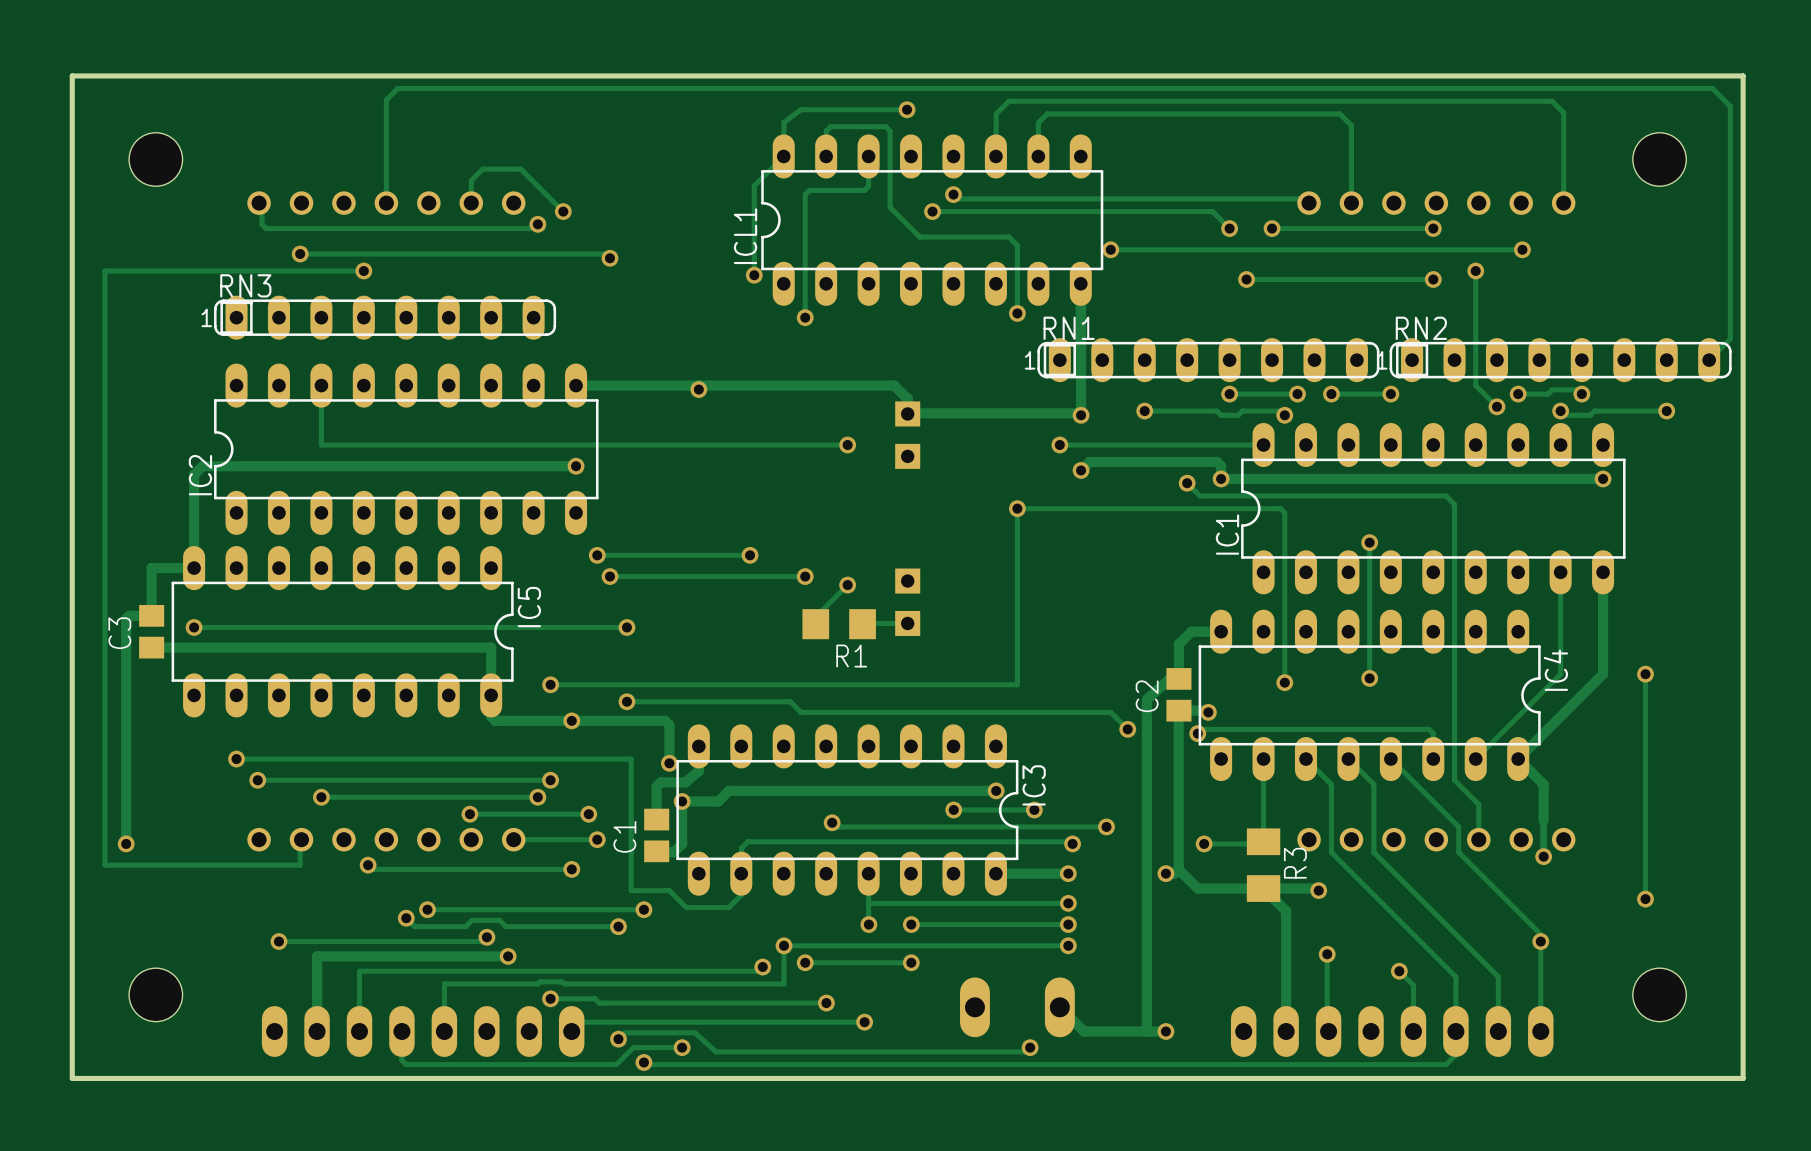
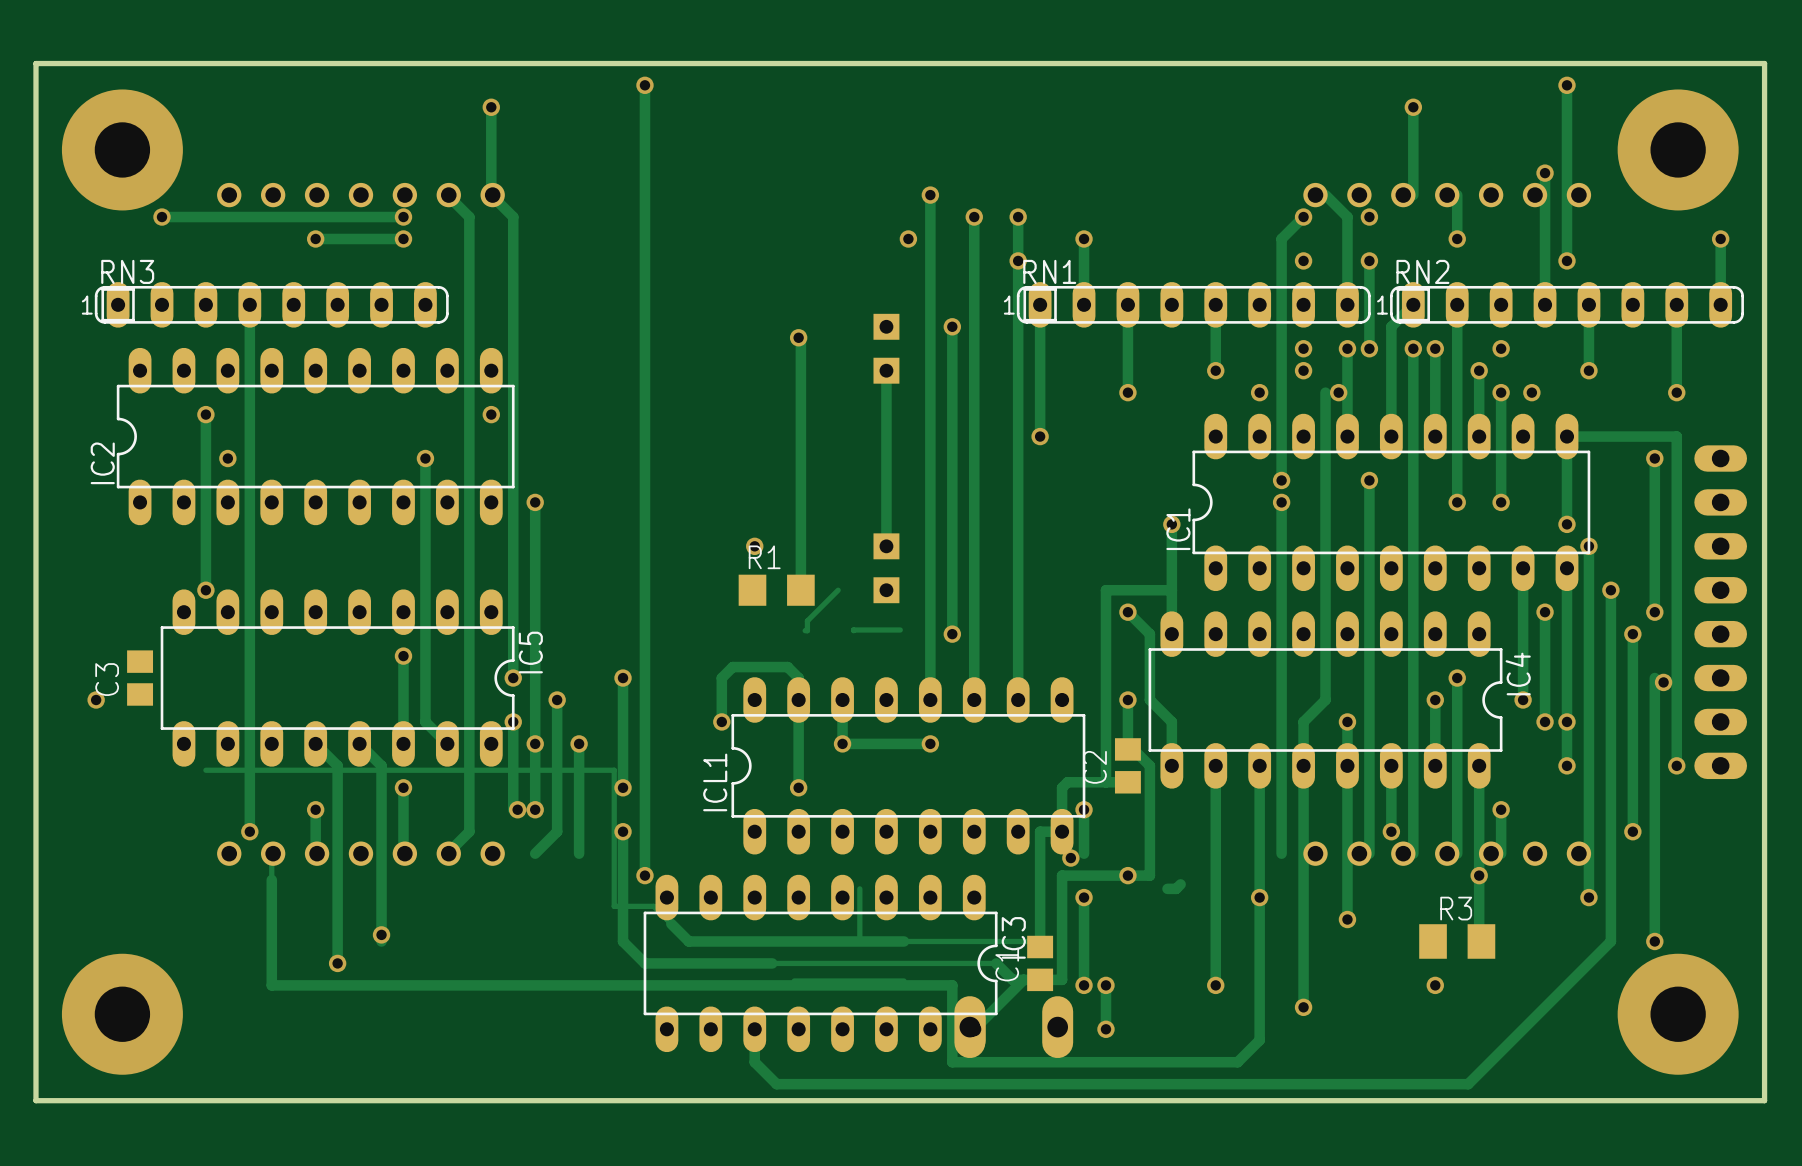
track: none -> (644, 85) (644, 875)
via: none -> (644, 85)
track: none -> (1566, 85) (1566, 260)
via: none -> (1566, 85)
track: (907, 109) (800, 109) (783, 122) (783, 156) (754, 185) (754, 275) -> none
via: (907, 109) -> none
track: none -> (491, 107) (491, 195) (513, 217) (513, 678)
via: none -> (491, 107)
track: none -> (1413, 107) (1413, 195)
via: none -> (1413, 107)
track: (826, 156) (826, 130) (830, 126) (885, 126) (890, 130) (890, 207) (919, 237) (1008, 237) (1017, 245) (1017, 313) -> none
track: (868, 156) (868, 186) (864, 190) (809, 190) (805, 194) (805, 317) -> none
track: (995, 156) (996, 113) (1008, 101) (1552, 101) (1563, 112) (1563, 203) -> none
track: (1038, 156) (1038, 122) (1047, 113) (1339, 113) (1351, 125) (1351, 203) -> none
part: (155, 159) -> none
via: none -> (122, 149)
part: (1659, 159) -> none
via: none -> (1678, 149)
track: none -> (1545, 173) (1545, 304)
via: none -> (1545, 173)
track: (953, 194) (957, 198) (1305, 198) (1309, 203) -> none
via: (953, 194) -> none
track: (259, 203) (261, 206) (261, 224) (266, 228) (529, 228) (533, 224) (537, 224) -> none
track: (386, 203) (386, 99) (397, 88) (1712, 88) (1730, 106) (1730, 338) (1709, 360) -> none
track: (471, 203) (471, 180) (482, 169) (520, 169) (563, 211) -> none
track: none -> (930, 195) (930, 700)
via: none -> (930, 195)
track: none -> (1325, 195) (1347, 217) (1347, 304)
track: none -> (1457, 195) (1457, 238)
via: (563, 211) -> none
track: (932, 211) (1212, 211) (1229, 228) -> none
via: (932, 211) -> none
ICL1 position: (932, 220) -> (908, 765)
via: none -> (162, 217)
track: none -> (403, 217) (162, 217)
via: none -> (403, 217)
via: (537, 224) -> none
track: none -> (974, 217) (974, 700)
via: none -> (974, 217)
track: none -> (1018, 217) (1018, 700)
via: none -> (1018, 217)
track: none -> (1303, 217) (1281, 238) (1281, 480)
via: none -> (1303, 217)
via: none -> (1369, 217)
via: (1229, 228) -> none
via: (1272, 228) -> none
track: (1433, 228) (1272, 228) -> none
via: (1433, 228) -> none
via: none -> (315, 238)
track: none -> (403, 238) (315, 238)
via: none -> (403, 238)
via: none -> (908, 238)
track: none -> (1084, 238) (1084, 304)
via: none -> (1457, 238)
track: none -> (1720, 238) (1720, 304)
via: none -> (1720, 238)
via position: (1110, 249) -> (1084, 238)
track: (1522, 249) (1110, 249) -> none
via: (1522, 249) -> none
track: (300, 254) (605, 254) (609, 258) -> none
via: (300, 254) -> none
via: (609, 258) -> none
via: none -> (1018, 260)
via: none -> (1303, 260)
track: none -> (1369, 260) (1369, 348)
via: none -> (1369, 260)
via: none -> (1566, 260)
track: (363, 271) (104, 271) (104, 865) (300, 865) -> (1259, 765) (1259, 1040) (1237, 1062) (952, 1062) (952, 985) (271, 985) (271, 880)
via: (363, 271) -> none
track: (1475, 271) (1475, 385) (1496, 406) -> none
via: (1475, 271) -> none
via: (754, 275) -> none
via: (1246, 279) -> none
track: (1433, 279) (1246, 279) -> none
via: (1433, 279) -> none
track: none -> (249, 304) (249, 831)
track: none -> (1040, 304) (1040, 436)
track: none -> (1127, 304) (1127, 392)
track: none -> (1215, 304) (1215, 370)
track: none -> (1413, 304) (1391, 326) (1391, 436)
track: none -> (1457, 304) (1457, 502)
track: none -> (1588, 304) (1588, 370)
track: none -> (1676, 304) (1676, 392)
via: (1017, 313) -> none
RN3 position: (385, 317) -> (271, 304)
via position: (805, 317) -> (798, 337)
track: (1080, 317) (1080, 283) (1081, 415) (1079, 413) (907, 413) -> none
track: none -> (952, 326) (952, 634)
via: none -> (952, 326)
track: none -> (798, 337) (800, 340) (800, 590)
part: none -> (886, 348)
via: none -> (1303, 348)
track: none -> (1347, 348) (1347, 436)
via: none -> (1347, 348)
via: none -> (1369, 348)
track: none -> (1413, 348) (1413, 853)
via: none -> (1413, 348)
track: none -> (1435, 348) (1435, 436)
via: none -> (1435, 348)
via: none -> (1501, 348)
RN1 position: (1208, 360) -> (1193, 304)
RN2 position: (1560, 360) -> (1566, 304)
track: none -> (886, 370) (886, 546)
via: none -> (1215, 370)
via: none -> (1303, 370)
track: none -> (1479, 370) (1479, 436)
via: none -> (1479, 370)
via: none -> (1588, 370)
track: (321, 385) (321, 445) (847, 445) -> none
track: (576, 385) (894, 385) (907, 398) (907, 413) -> none
via: (698, 389) -> none
via: (1229, 394) -> none
via: none -> (1259, 392)
track: (1297, 394) (1229, 394) -> none
via: (1297, 394) -> none
track: none -> (1325, 392) (1325, 700) (1303, 721) (1303, 1007)
track: (1390, 394) (1331, 394) -> none
via: (1390, 394) -> none
track: none -> (1501, 392) (1501, 502)
track: (1581, 394) (1577, 389) (1552, 389) (1547, 394) (1518, 394) -> none
via: (1581, 394) -> none
via position: (1496, 406) -> (1501, 392)
track: (1144, 411) (1216, 411) (1221, 415) (1238, 415) (1242, 411) (1280, 411) (1284, 415) -> none
via position: (1144, 411) -> (1127, 392)
via: (1560, 411) -> none
track: (1666, 411) (1594, 411) (1590, 415) (1564, 415) (1560, 411) -> none
via position: (1666, 411) -> (1676, 392)
track: none -> (205, 414) (205, 590)
via: none -> (205, 414)
via: none -> (491, 414)
via: (1081, 415) -> none
via: (1284, 415) -> none
part: (907, 435) -> none
via: (847, 445) -> none
via position: (1059, 445) -> (1040, 436)
track: (1263, 445) (1059, 445) -> none
IC2 position: (406, 449) -> (315, 436)
via: none -> (227, 458)
track: none -> (425, 458) (425, 721) (447, 743)
via: none -> (425, 458)
track: none -> (1654, 458) (1654, 612)
via: none -> (1654, 458)
track: (576, 466) (202, 466) (194, 474) (194, 568) (151, 568) (151, 615) (129, 615) (126, 619) (126, 843) -> none
via: (576, 466) -> none
track: (1081, 470) (1089, 461) (1216, 461) (1221, 466) (1221, 478) (1603, 478) -> none
via: (1081, 470) -> none
via: (1221, 478) -> none
via: none -> (1281, 480)
track: none -> (1369, 480) (1369, 853)
via: none -> (1369, 480)
via: (1603, 478) -> none
track: (1187, 483) (1199, 495) (1446, 495) (1454, 504) (1454, 780) (1478, 804) (1478, 839) -> none
via: (1187, 483) -> none
track: none -> (535, 502) (535, 809)
via: none -> (535, 502)
track: none -> (1281, 502) (1281, 853)
via: none -> (1281, 502)
via: none -> (1457, 502)
via: none -> (1501, 502)
via: (1017, 508) -> none
IC1 position: (1433, 508) -> (1391, 502)
track: none -> (1171, 524) (1171, 634)
via: none -> (1171, 524)
track: none -> (1566, 524) (1566, 436) (1676, 436) (1676, 765)
via: none -> (1566, 524)
track: (1369, 542) (1369, 678) -> none
via: (1369, 542) -> none
track: none -> (1588, 546) (1588, 897)
via: none -> (1588, 546)
via: (597, 555) -> none
track: (750, 555) (597, 555) -> none
via position: (750, 555) -> (754, 546)
track: none -> (1523, 568) (1523, 700)
track: none -> (1566, 568) (1566, 765)
track: (1560, 572) (1560, 674) (1475, 759) -> none
track: (1603, 572) (1603, 674) (1518, 759) (1543, 784) (1543, 856) -> none
via: (609, 576) -> none
track: (805, 576) (609, 576) -> none
via: (805, 576) -> none
via: none -> (205, 590)
via: (847, 585) -> none
track: none -> (1171, 590) (1105, 590) (1105, 782)
track: none -> (1610, 590) (1610, 941) (1468, 1084) (776, 1084) (754, 1062) (754, 1029)
via: none -> (1610, 590)
part position: (907, 602) -> (886, 568)
track: none -> (1127, 612) (1149, 634) (1149, 700) (1171, 721) (1171, 765)
via: none -> (1127, 612)
track: none -> (1545, 612) (1545, 721)
via: none -> (1545, 612)
via: none -> (1654, 612)
part: none -> (1720, 612)
R1 position: (839, 624) -> (776, 590)
via: (194, 627) -> none
track: (626, 627) (194, 627) -> none
via: (626, 627) -> none
via: none -> (952, 634)
track: none -> (1632, 634) (1632, 831)
via: none -> (1632, 634)
C3 position: (151, 631) -> (140, 678)
IC5 position: (342, 631) -> (337, 678)
track: (1221, 631) (1191, 631) (1178, 644) (1178, 678) (1169, 678) (1146, 699) (1146, 1031) -> none
track: (491, 647) (151, 647) -> (469, 654) (469, 217) (447, 195)
track: none -> (403, 656) (403, 743)
via: none -> (403, 656)
R1 name position: R1 (851, 656) -> R1 (764, 557)
via: none -> (513, 678)
track: none -> (623, 678) (623, 787)
via: none -> (623, 678)
track: none -> (1457, 678) (1457, 853)
via: none -> (1457, 678)
track: none -> (1654, 678) (1654, 941)
track: (1645, 674) (1645, 899) -> none
via: (1369, 678) -> none
track: (1284, 682) (1284, 512) (1280, 508) (1017, 508) (1017, 684) (550, 684) -> none
via: (1284, 682) -> none
via: (550, 684) -> none
via: none -> (96, 700)
track: none -> (557, 700) (557, 831) (535, 853)
via: none -> (557, 700)
track: none -> (842, 700) (842, 743) (930, 743)
track: none -> (1435, 700) (1435, 765)
via: none -> (1435, 700)
via: none -> (1523, 700)
C2 position: (1178, 694) -> (1127, 765)
IC4 position: (1369, 695) -> (1325, 700)
track: (626, 701) (790, 701) (800, 712) (1110, 712) (1127, 729) -> none
via: (626, 701) -> none
track: none -> (513, 721) (513, 809)
via: none -> (513, 721)
track: none -> (721, 721) (721, 678) (732, 667) (787, 667) (798, 678) (798, 787)
via: none -> (721, 721)
track: (1208, 712) (1178, 710) (1178, 869) (1197, 888) (1316, 888) (1318, 890) -> none
via: (1208, 712) -> none
track: none -> (1347, 721) (1347, 919)
via: none -> (1347, 721)
via: none -> (1545, 721)
via: none -> (1566, 721)
track: (491, 716) (495, 720) (665, 720) (669, 725) (669, 763) -> (469, 726) (469, 831) (447, 853)
via: (571, 720) -> none
via position: (1127, 729) -> (1127, 700)
track: none -> (315, 743) (337, 765) (337, 963)
track: none -> (359, 743) (381, 765) (381, 941)
via: none -> (535, 743)
via: none -> (579, 743)
via: none -> (842, 743)
via: none -> (930, 743)
track: (1197, 733) (1202, 729) (1429, 729) (1433, 733) (1433, 759) -> none
via: (1197, 733) -> none
track: (698, 746) (698, 771) (685, 782) (660, 782) (656, 786) (656, 819) -> none
track: none -> (1215, 765) (1215, 985)
track: none -> (1391, 765) (1391, 831)
via: none -> (1566, 765)
via: none -> (1676, 765)
via: (236, 759) -> none
track: (1263, 759) (1263, 841) (1261, 843) (1204, 843) -> none
track: (1305, 759) (1331, 784) (1331, 852) (1455, 976) (1455, 1031) -> none
track: (1348, 759) (1373, 784) (1373, 852) (1498, 976) (1498, 1031) -> none
track: (1390, 759) (1458, 826) (1458, 852) (1540, 934) (1540, 1031) -> none
via: (669, 763) -> none
track: none -> (1481, 779) (1479, 765) (1479, 930) (1481, 932) (1481, 941)
track: none -> (1127, 782) (1067, 782) (1062, 787) (1062, 831) (1040, 831) (1040, 947)
track: none -> (403, 787) (403, 853)
via: none -> (403, 787)
via: none -> (623, 787)
via: none -> (798, 787)
via: (257, 780) -> none
track: (550, 780) (257, 780) -> none
via position: (550, 780) -> (535, 809)
track: (996, 790) (728, 790) (718, 801) (682, 801) (682, 843) (673, 852) (656, 851) -> none
via: (996, 790) -> none
via position: (321, 797) -> (315, 809)
track: none -> (315, 809) (315, 853)
track: (537, 797) (321, 797) -> none
track: none -> (1084, 809) (1084, 853)
via: none -> (1084, 809)
track: none -> (1501, 809) (1501, 853)
via: none -> (1501, 809)
via: (682, 801) -> none
via: (953, 809) -> none
track: (1034, 809) (953, 809) -> none
via: (1034, 809) -> none
IC3 position: (847, 810) -> (820, 963)
via: (469, 814) -> none
track: (588, 814) (469, 814) -> none
via: (588, 814) -> none
via: none -> (249, 831)
via: none -> (623, 831)
via: none -> (1391, 831)
via: none -> (1632, 831)
track: (832, 822) (834, 826) (1017, 827) -> none
via: (832, 822) -> none
track: (1106, 826) (1017, 826) -> none
via: (1106, 826) -> none
C1 position: (656, 835) -> (1040, 963)
track: (597, 839) (513, 839) -> (579, 853) (579, 743)
via: (597, 839) -> none
via: (126, 843) -> none
track: (1072, 843) (1070, 841) (747, 841) (741, 848) (741, 894) (728, 907) (686, 907) -> (904, 941) (688, 941) (671, 923)
via: (1204, 843) -> none
via: (1543, 856) -> none
via: none -> (644, 875)
via: none -> (1127, 875)
via: none -> (1479, 875)
R3 name position: R3 (1295, 863) -> R3 (1456, 908)
track: (368, 865) (368, 869) (571, 869) -> none
via: (368, 865) -> none
R3 rotation: 0° (1263, 865) -> 90° clockwise (1457, 941)
R3 position: (1263, 865) -> (1457, 941)
via: (571, 869) -> none
track: (1068, 873) (995, 873) -> none
via: (1068, 873) -> none
via: (1165, 873) -> none
track: none -> (1084, 897) (1084, 985)
via: none -> (1084, 897)
via: none -> (1259, 897)
via: none -> (1588, 897)
track: (1263, 888) (1286, 911) (1286, 1031) -> none
via position: (1318, 890) -> (1347, 919)
via position: (1645, 899) -> (1654, 941)
track: (1068, 903) (868, 903) -> none
via: (1068, 903) -> none
via: (427, 909) -> none
track: (643, 909) (427, 909) -> none
via: (643, 909) -> none
track: (406, 918) (414, 926) (465, 926) (472, 920) (499, 920) (506, 926) (618, 926) -> none
via: (868, 924) -> none
via: (911, 924) -> none
track: (1068, 924) (1042, 924) -> none
via: (1068, 924) -> none
via: (618, 926) -> none
track: (486, 937) (482, 941) (278, 941) -> none
via: (486, 937) -> none
via: (278, 941) -> none
via: (1540, 941) -> none
via: none -> (337, 963)
track: (783, 945) (783, 983) (565, 983) (561, 981) (539, 981) (537, 983) (444, 983) (444, 1031) -> (772, 963) (644, 963) (623, 941) (623, 831)
via: (783, 945) -> none
track: (1068, 945) (1000, 945) -> (1127, 700) (1127, 749) (1133, 749) (1149, 765) (1149, 875) (1062, 875) (1062, 979) (1012, 979) (996, 963)
via: (1068, 945) -> none
track: (1327, 954) (1328, 1031) -> none
via: (1327, 954) -> none
track: (508, 956) (317, 956) (317, 1031) -> none
via: (508, 956) -> none
track: none -> (1023, 979) (974, 1029)
via: (805, 962) -> none
via: (911, 962) -> none
track: (762, 967) (758, 971) (359, 971) (359, 1031) -> none
via: (762, 967) -> none
via: none -> (1084, 985)
track: none -> (1105, 985) (1105, 1029)
via: none -> (1105, 985)
via: none -> (1215, 985)
track: (1399, 971) (1413, 985) (1413, 1031) -> none
via position: (1399, 971) -> (1435, 985)
via: none -> (1303, 1007)
part: (155, 994) -> none
via: none -> (122, 1014)
part: (1659, 994) -> none
via: none -> (1678, 1014)
track: (550, 998) (595, 998) (599, 1003) (826, 1003) -> none
via: (550, 998) -> none
via: (826, 1003) -> none
track: (1059, 1007) (1084, 1031) (1165, 1031) -> none
via: none -> (1105, 1029)
track: (864, 1022) (571, 1022) (571, 1031) -> none
via: (864, 1022) -> none
track: (1455, 1022) (1454, 1056) (1446, 1064) (646, 1064) (643, 1062) -> none
track: (401, 1031) (401, 1060) (406, 1064) (616, 1064) (633, 1047) (682, 1047) -> none
part: (423, 1031) -> none
via: (1165, 1031) -> none
part: (1392, 1031) -> none
track: (618, 1039) (624, 1032) (694, 1032) (716, 1051) (1025, 1051) (1030, 1047) -> none
via: (618, 1039) -> none
via: (682, 1047) -> none
via: (1030, 1047) -> none
via: (643, 1062) -> none

